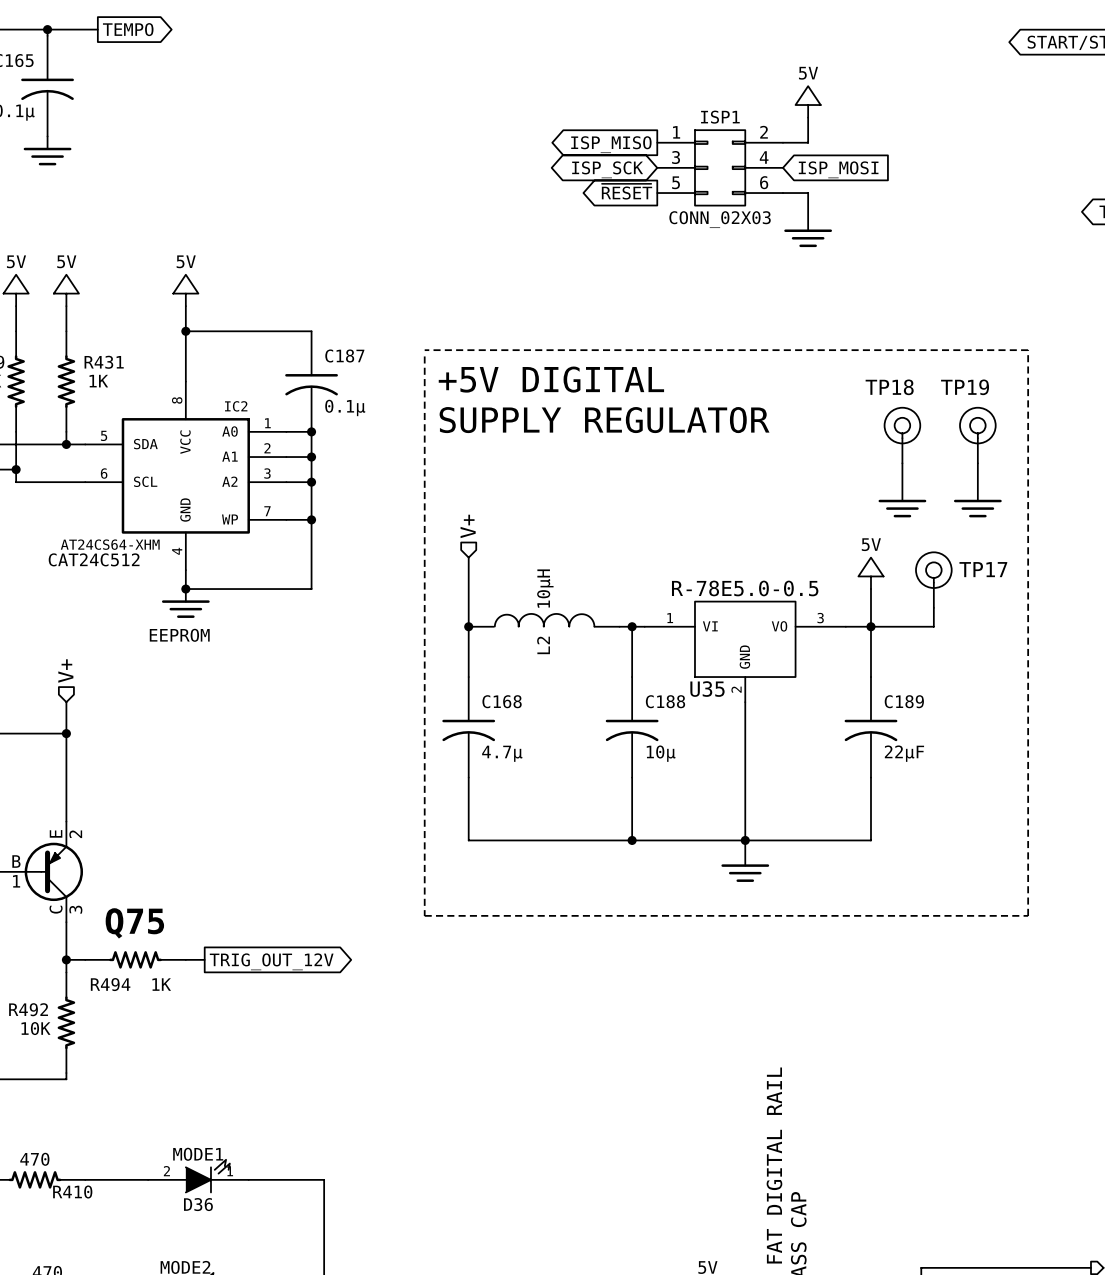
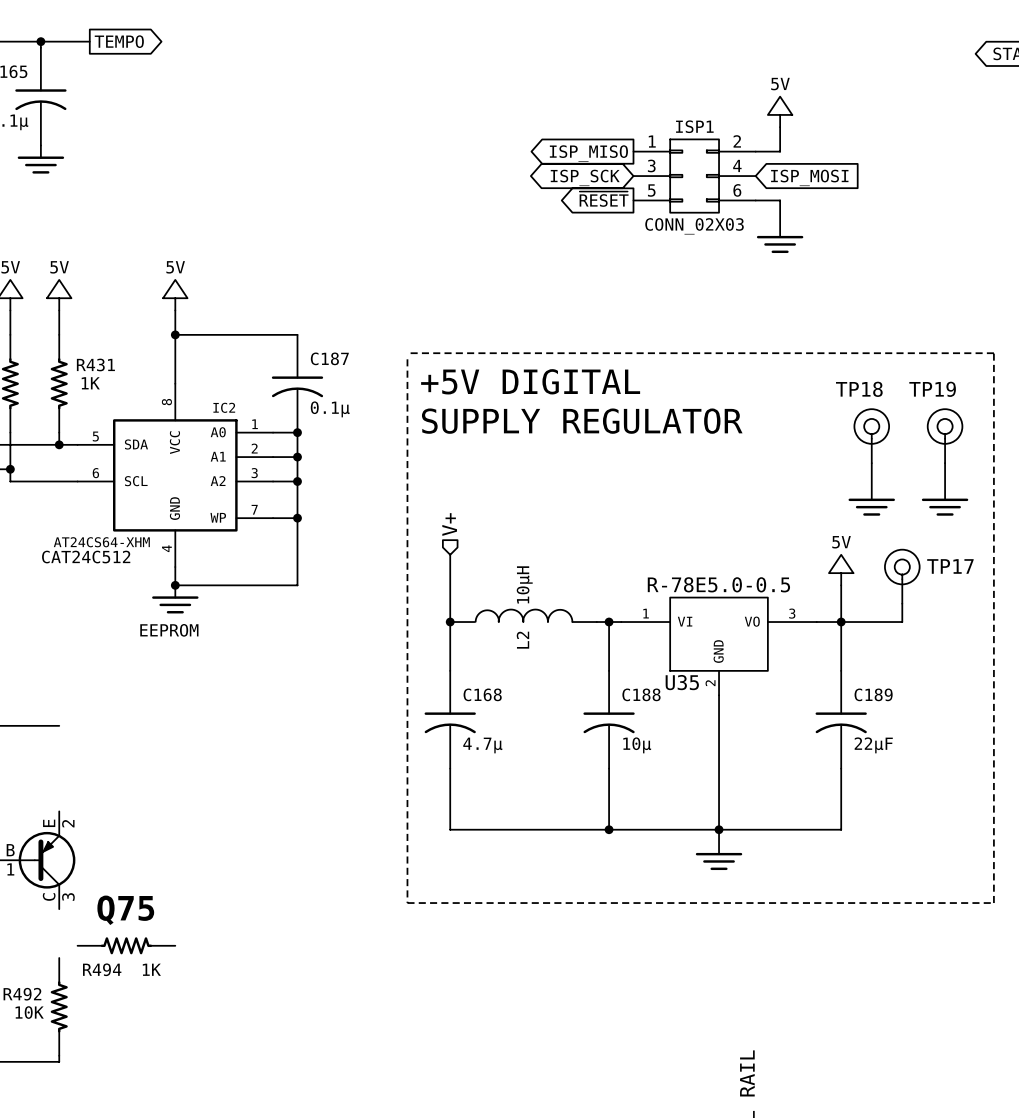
hierarchical label: V+ (65, 671) -> none
wire: (66, 702) (66, 821) -> none
junction: (66, 733) -> none
wire: (66, 922) (66, 972) -> none
wire: (66, 959) (85, 959) -> none
junction: (66, 959) -> none
wire: (185, 959) (204, 959) -> none
global label: TRIG_OUT_12V (271, 961) -> none

